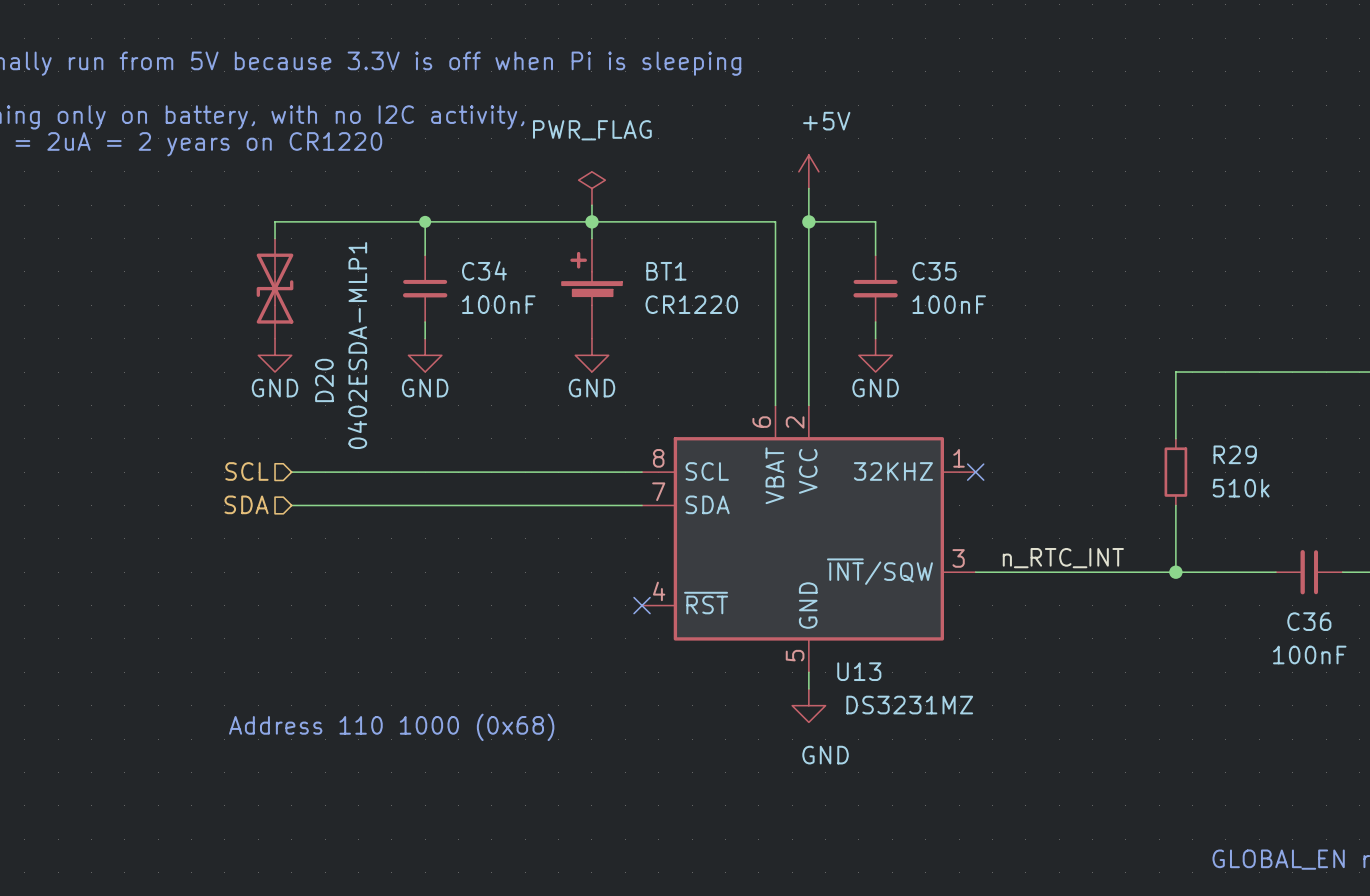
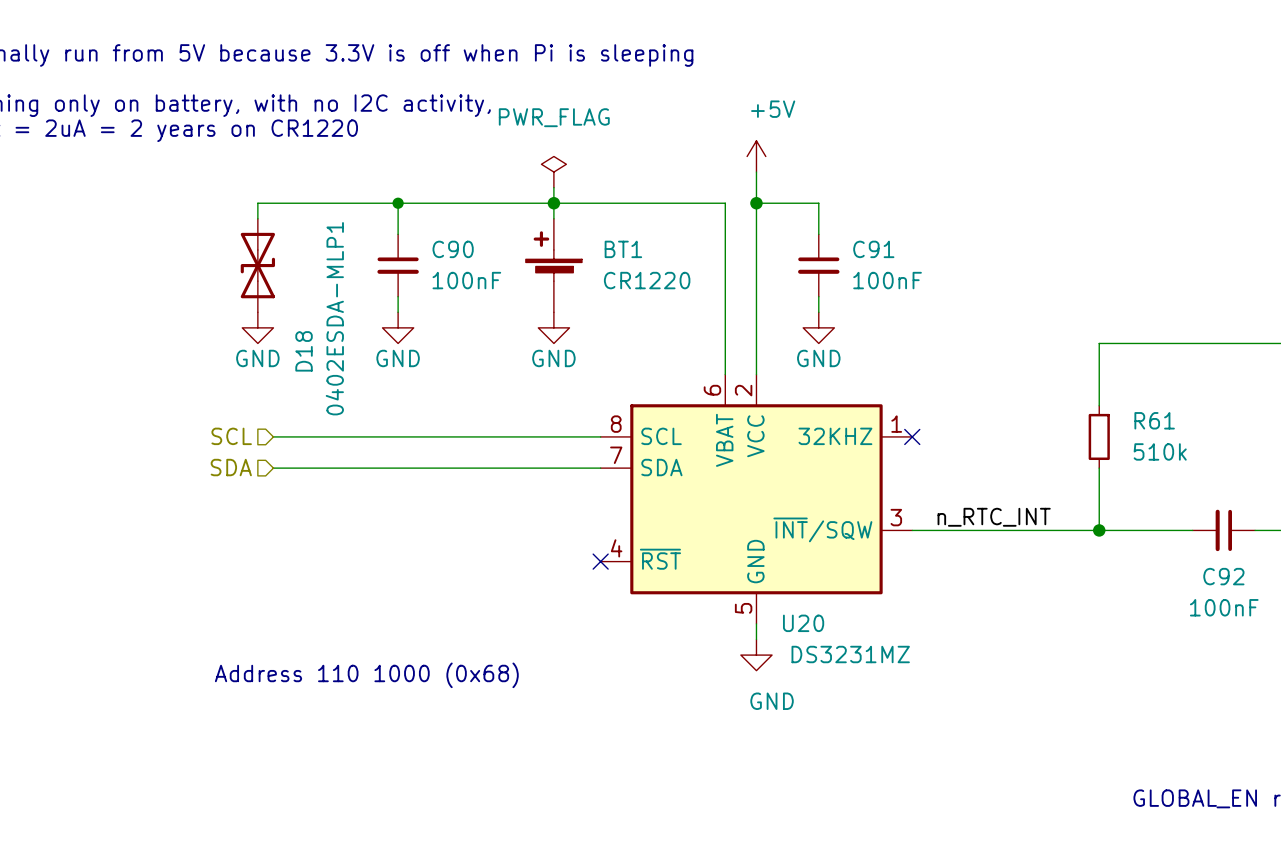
C34 name: C34 (484, 270) -> C90 (453, 249)
C35 name: C35 (934, 271) -> C91 (873, 249)
D20 name: D20 (324, 380) -> D18 (304, 351)
R29 name: R29 (1235, 454) -> R61 (1154, 420)
C36 name: C36 (1309, 621) -> C92 (1223, 576)
U13 name: U13 (859, 671) -> U20 (803, 623)

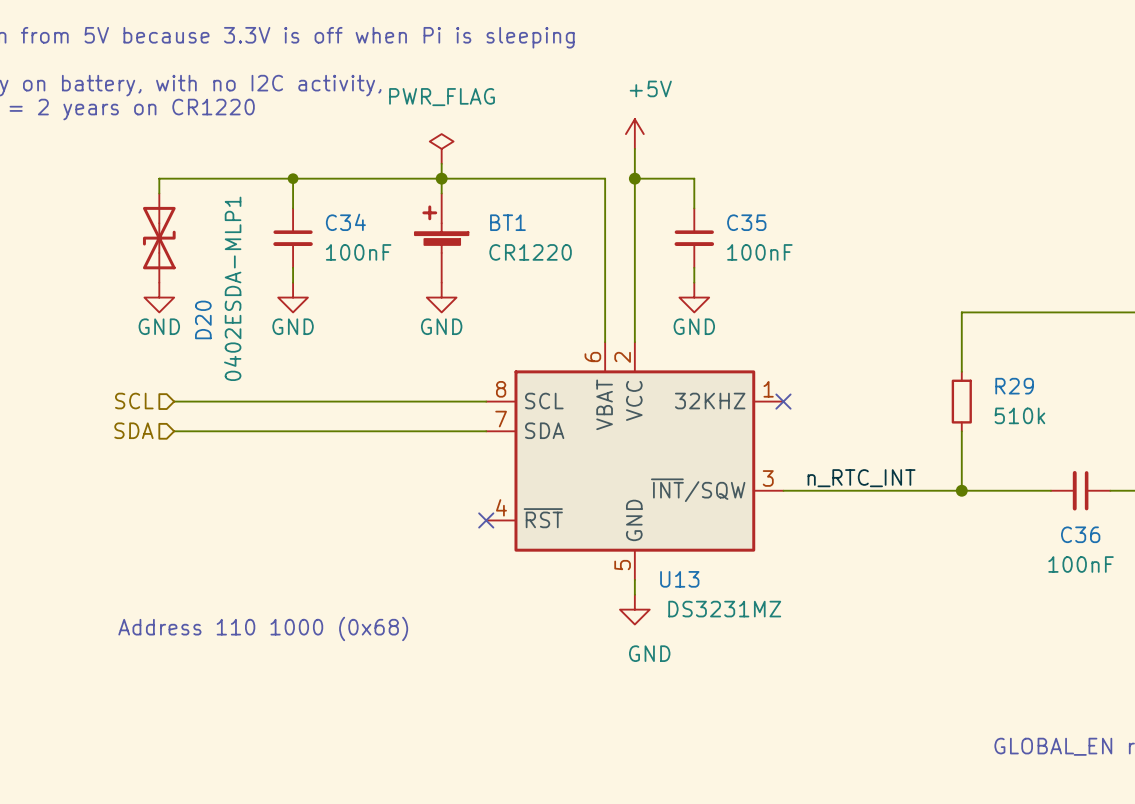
C90 name: C90 (453, 249) -> C34 (345, 222)
C91 name: C91 (873, 249) -> C35 (746, 222)
D18 name: D18 (304, 351) -> D20 (203, 319)
R61 name: R61 (1154, 420) -> R29 (1014, 386)
C92 name: C92 (1223, 576) -> C36 (1080, 534)
U20 name: U20 (803, 623) -> U13 (679, 579)

